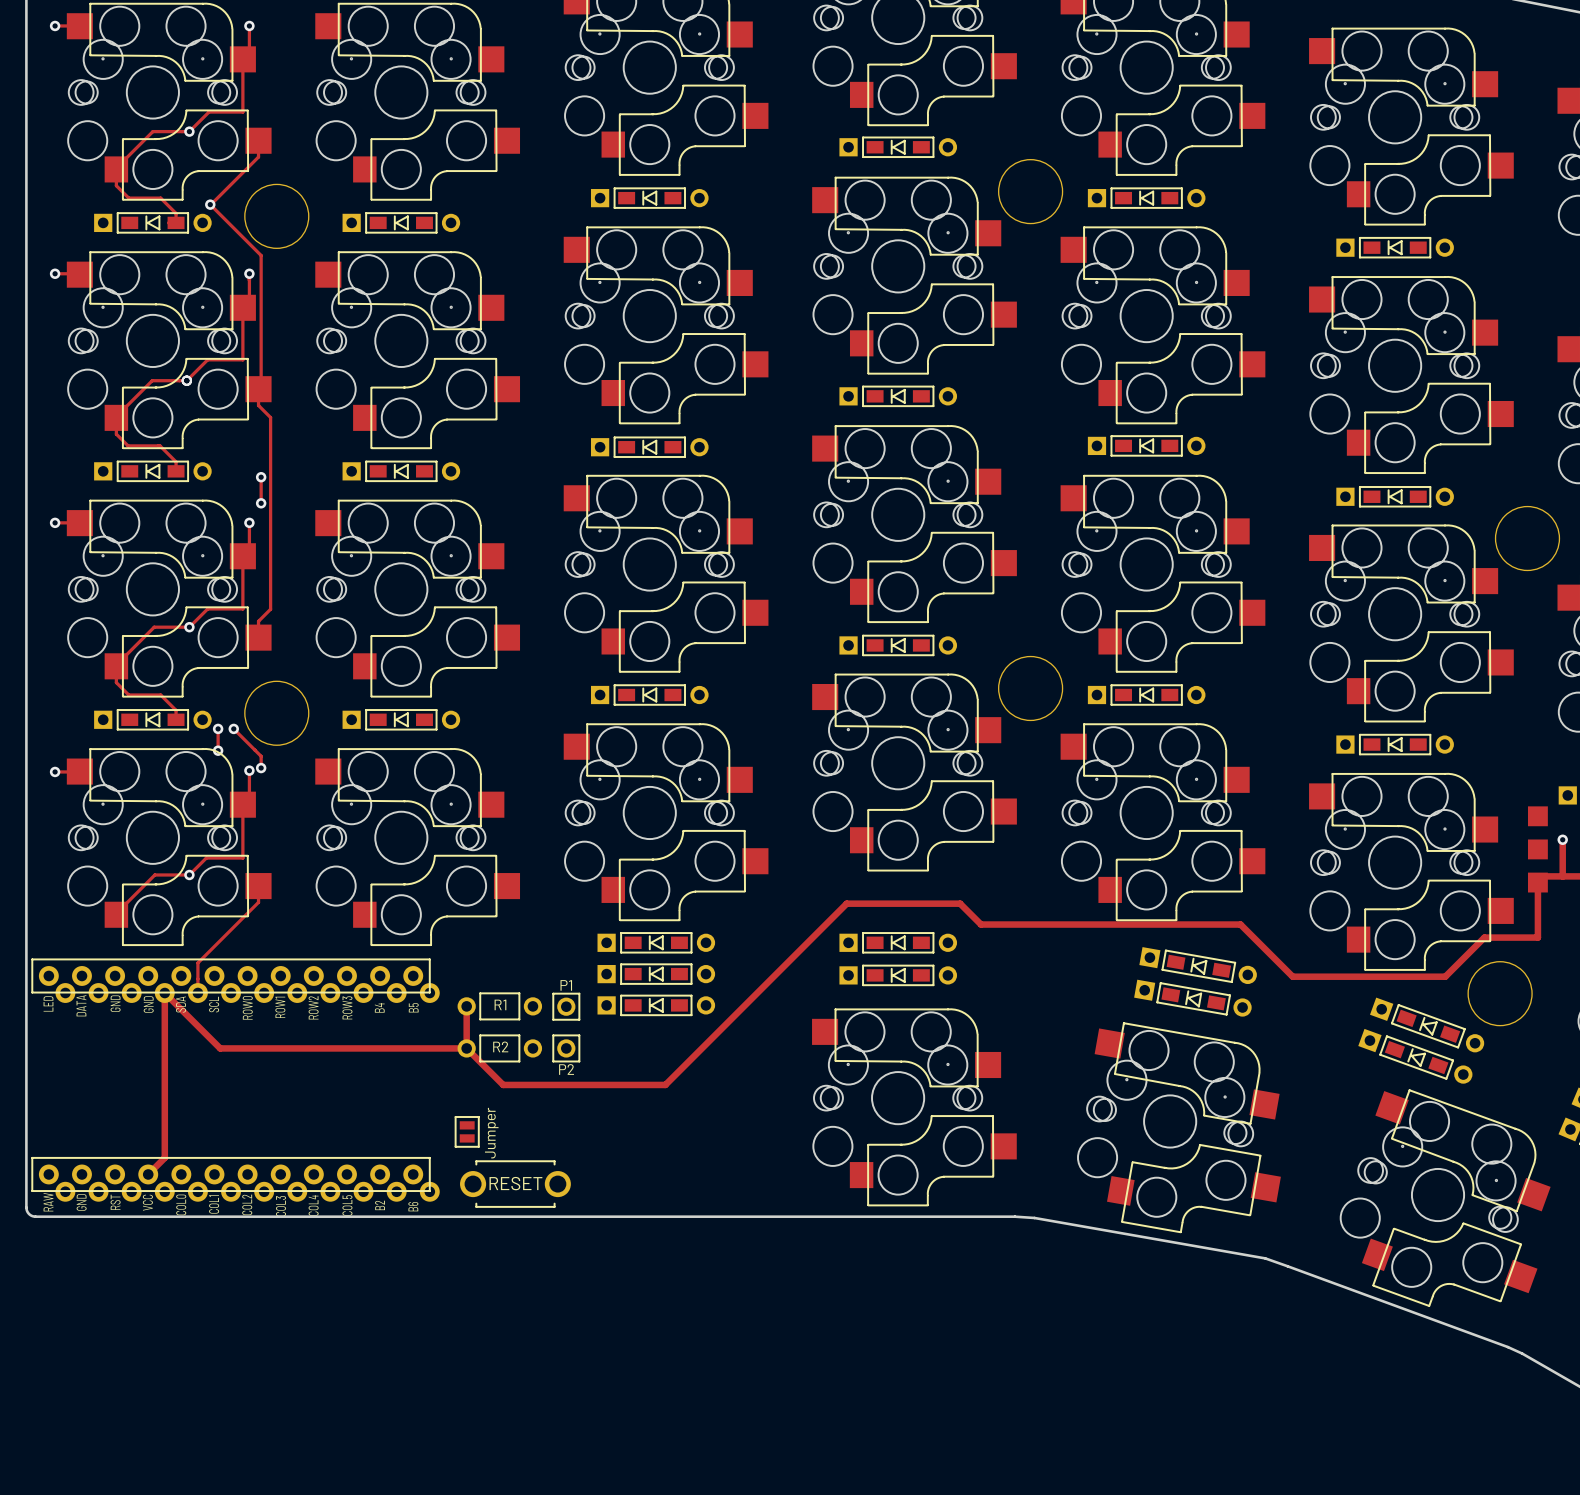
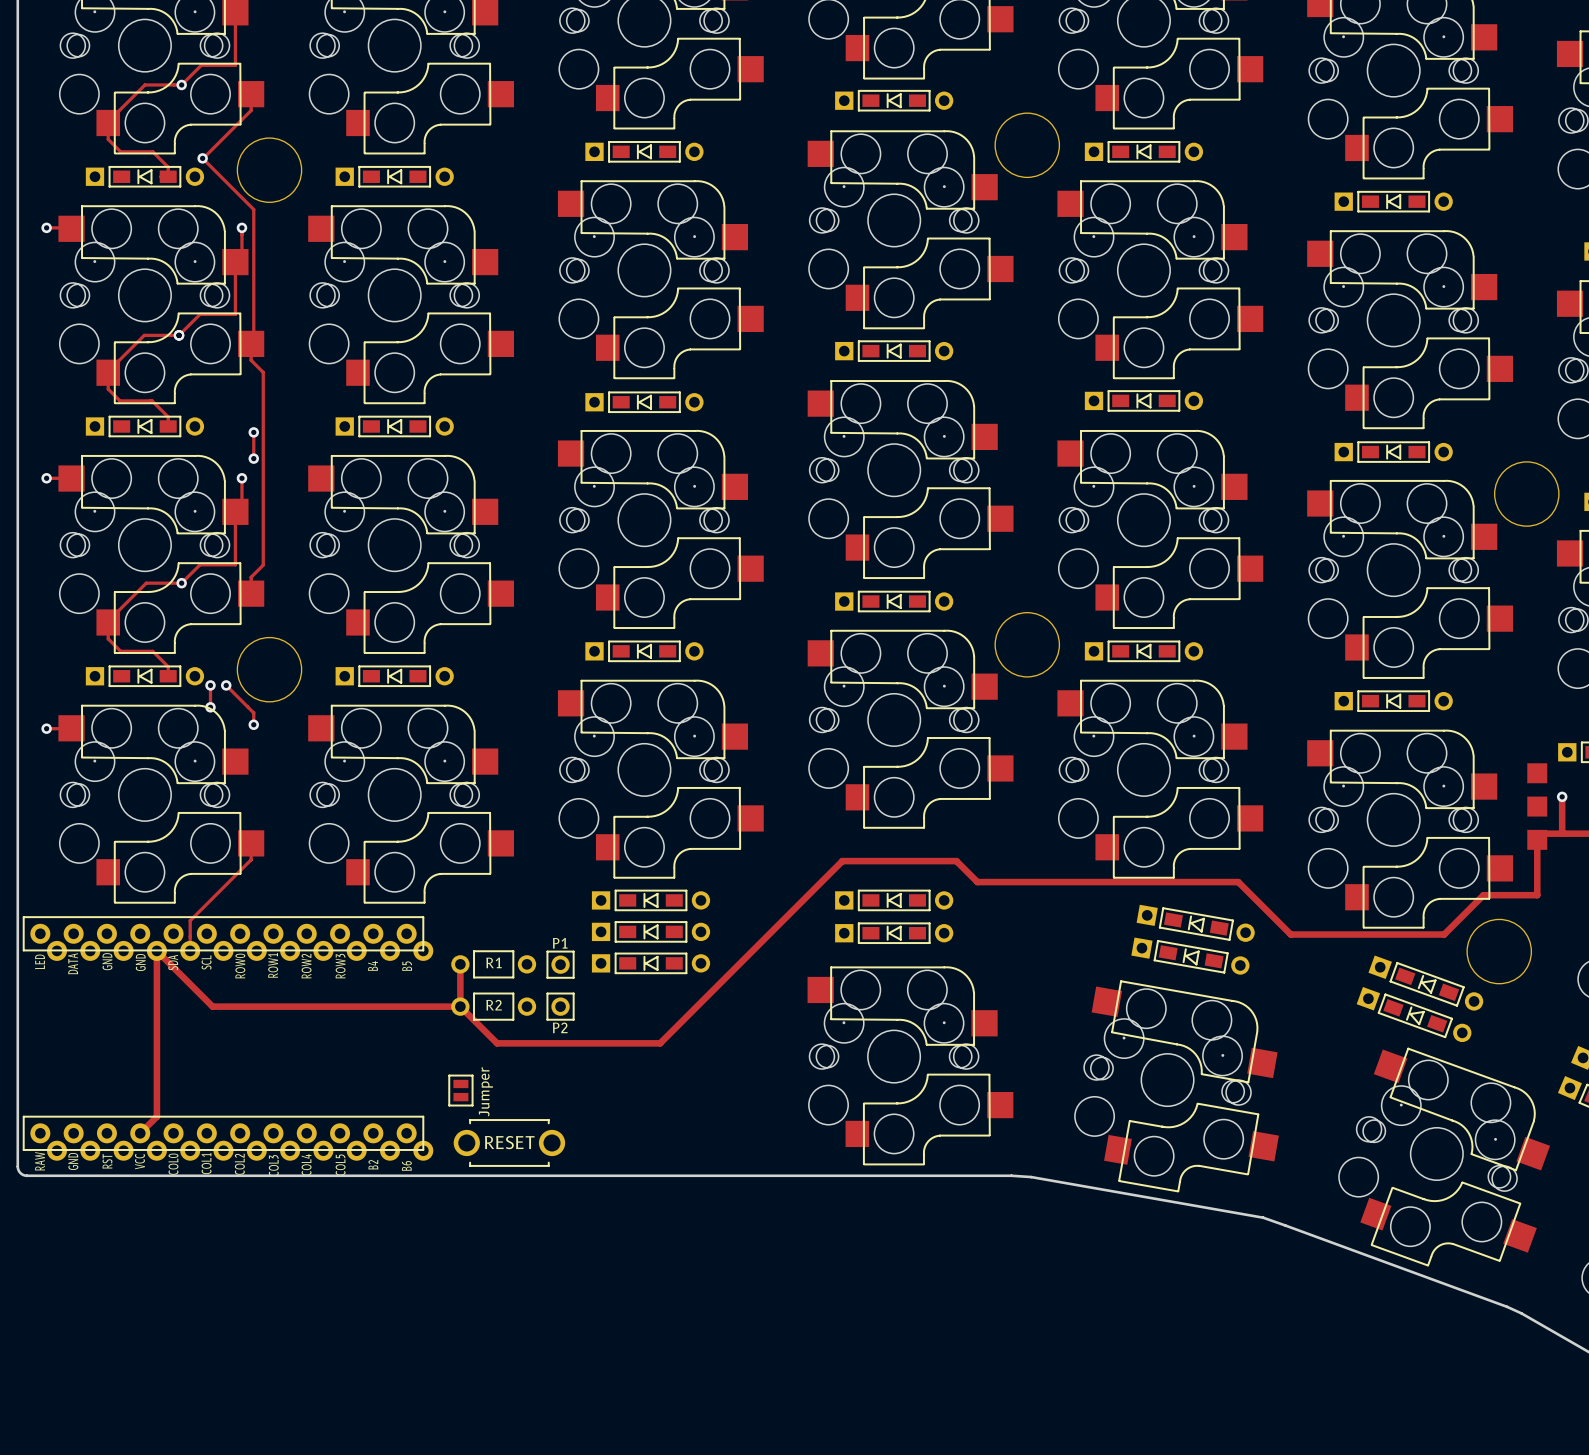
track: (249, 770) (249, 808) -> none
via: (249, 770) -> none
track: (242, 804) (242, 858) (206, 858) (189, 874) (154, 874) (116, 914) -> none
via: (189, 874) -> none

